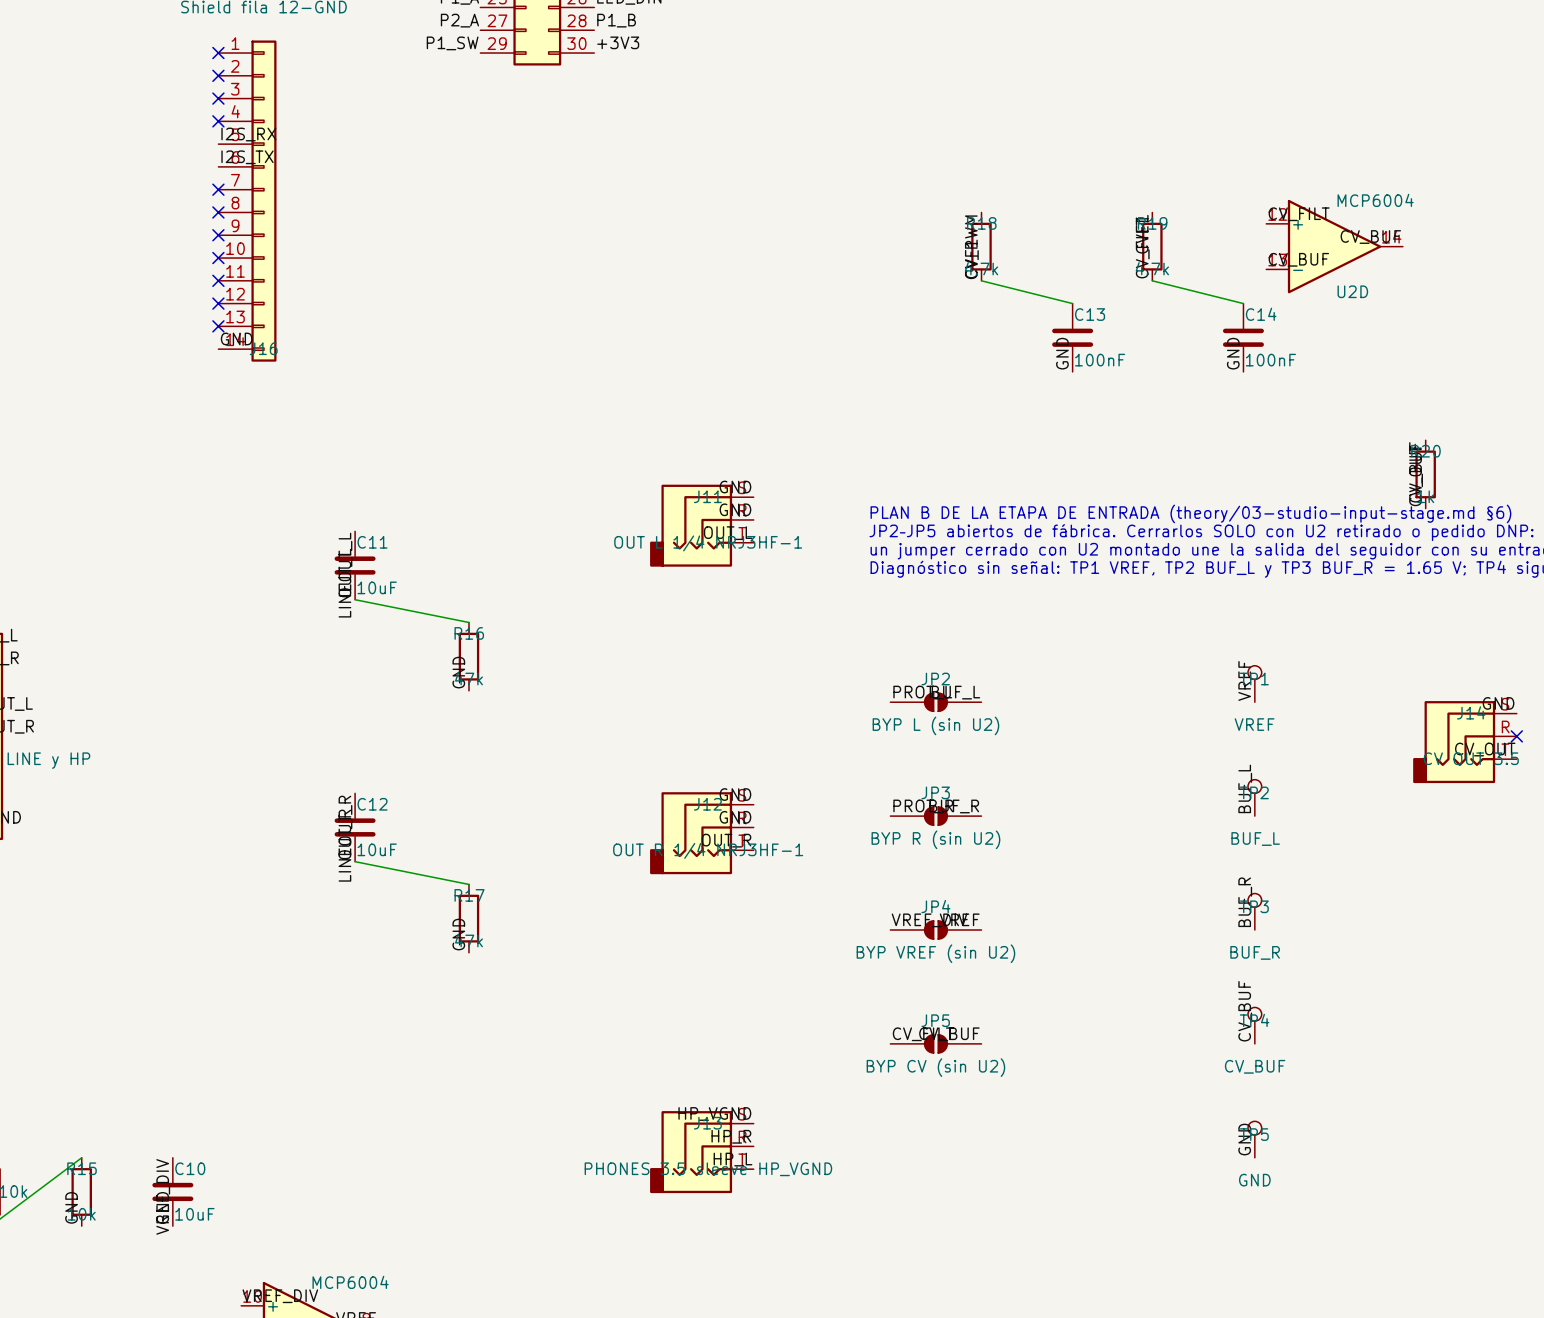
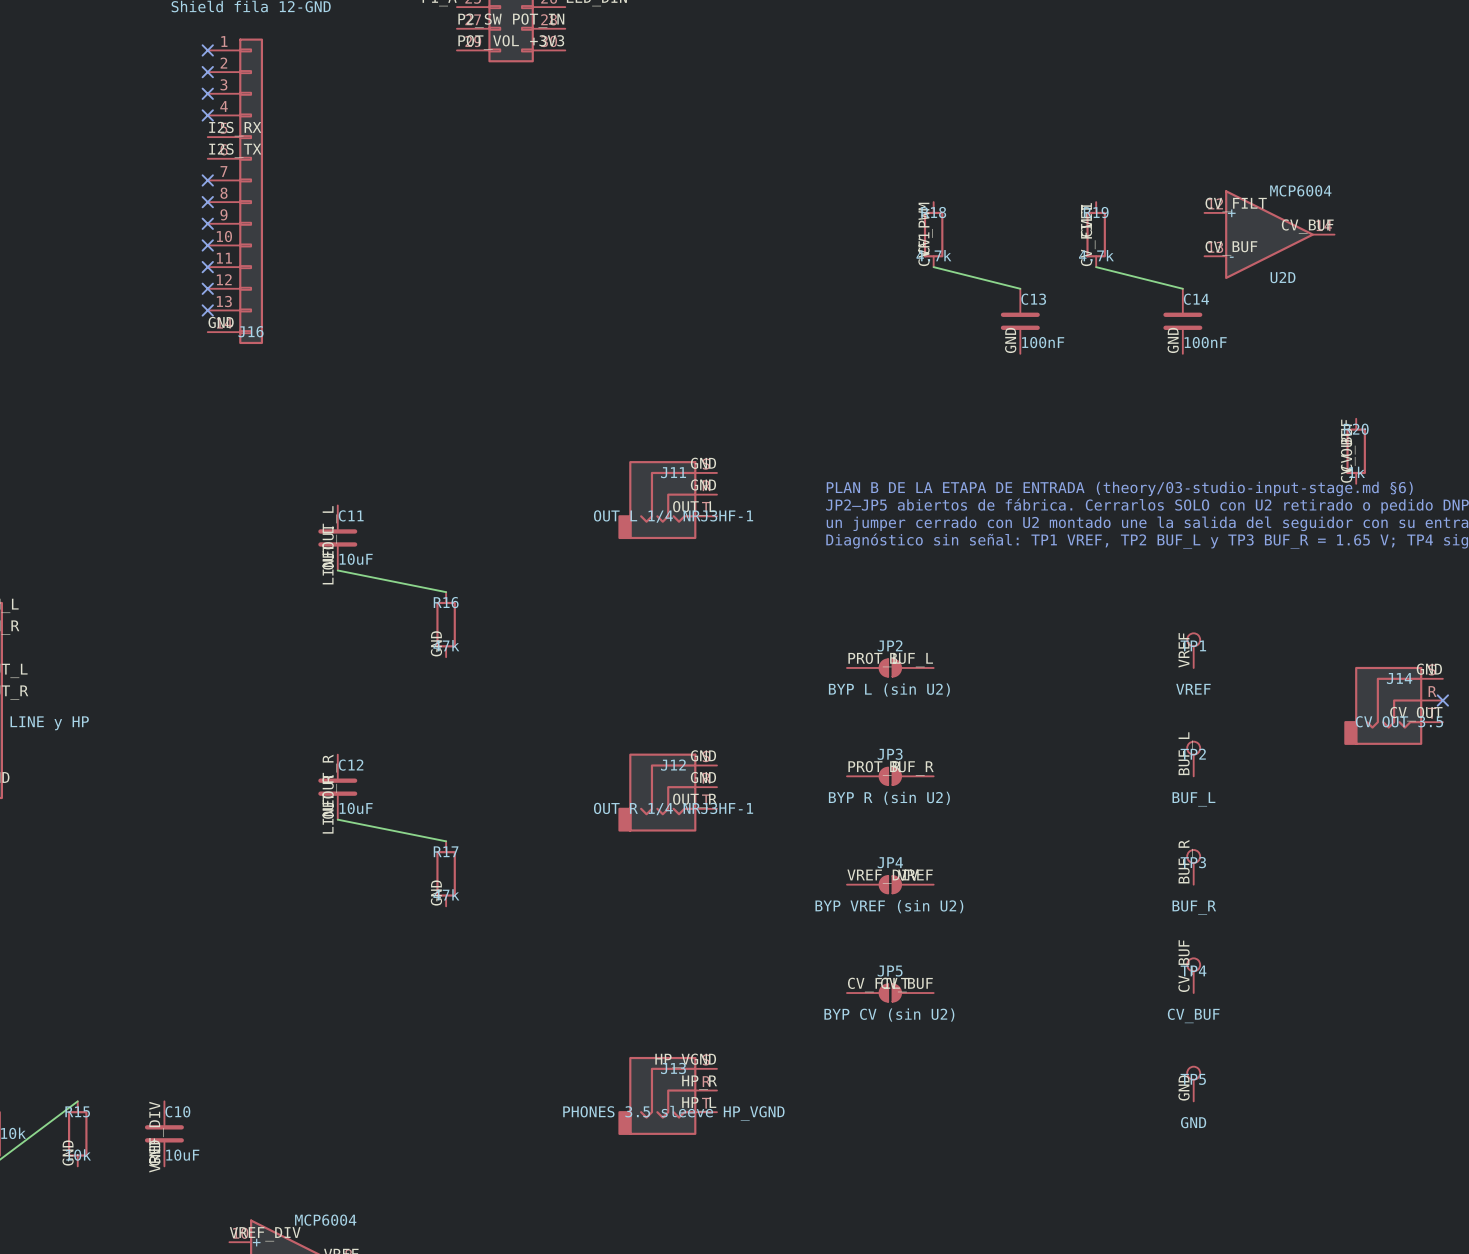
label: P2_A (459, 20) -> P2_SW (480, 20)
label: P1_B (616, 20) -> POT_IN (538, 20)
label position: +3V3 (618, 42) -> +3V3 (547, 40)
label: P1_SW (452, 43) -> POT_VOL (488, 42)

